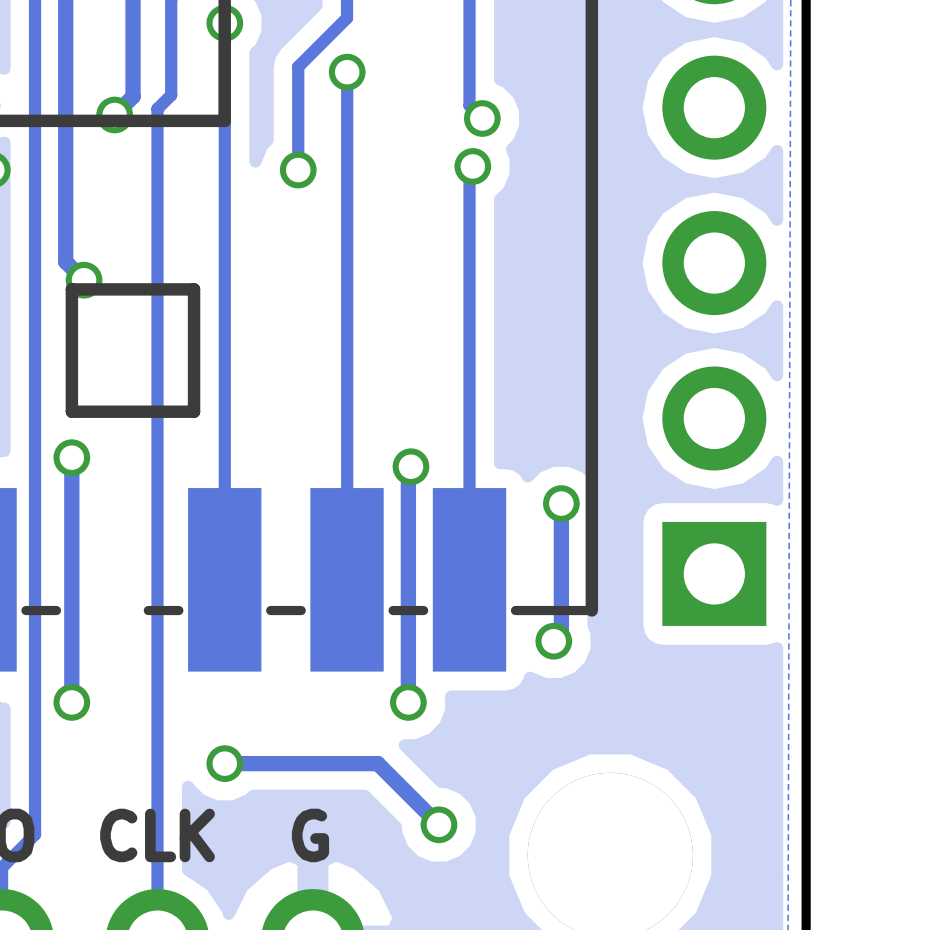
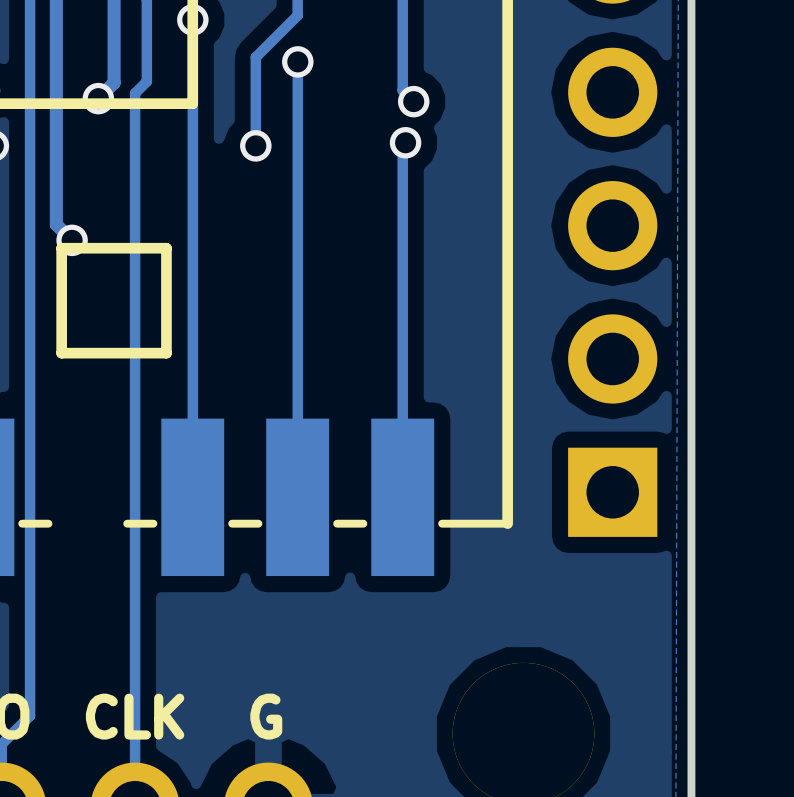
track: (71, 457) (71, 702) -> none
via: (71, 457) -> none
track: (410, 466) (408, 469) (408, 702) -> none
via: (410, 466) -> none
track: (561, 503) (561, 633) (553, 641) -> none
via: (561, 503) -> none
via: (553, 641) -> none
via: (71, 702) -> none
via: (408, 702) -> none
track: (224, 763) (377, 763) (438, 824) -> none
via: (224, 763) -> none
via: (438, 824) -> none

